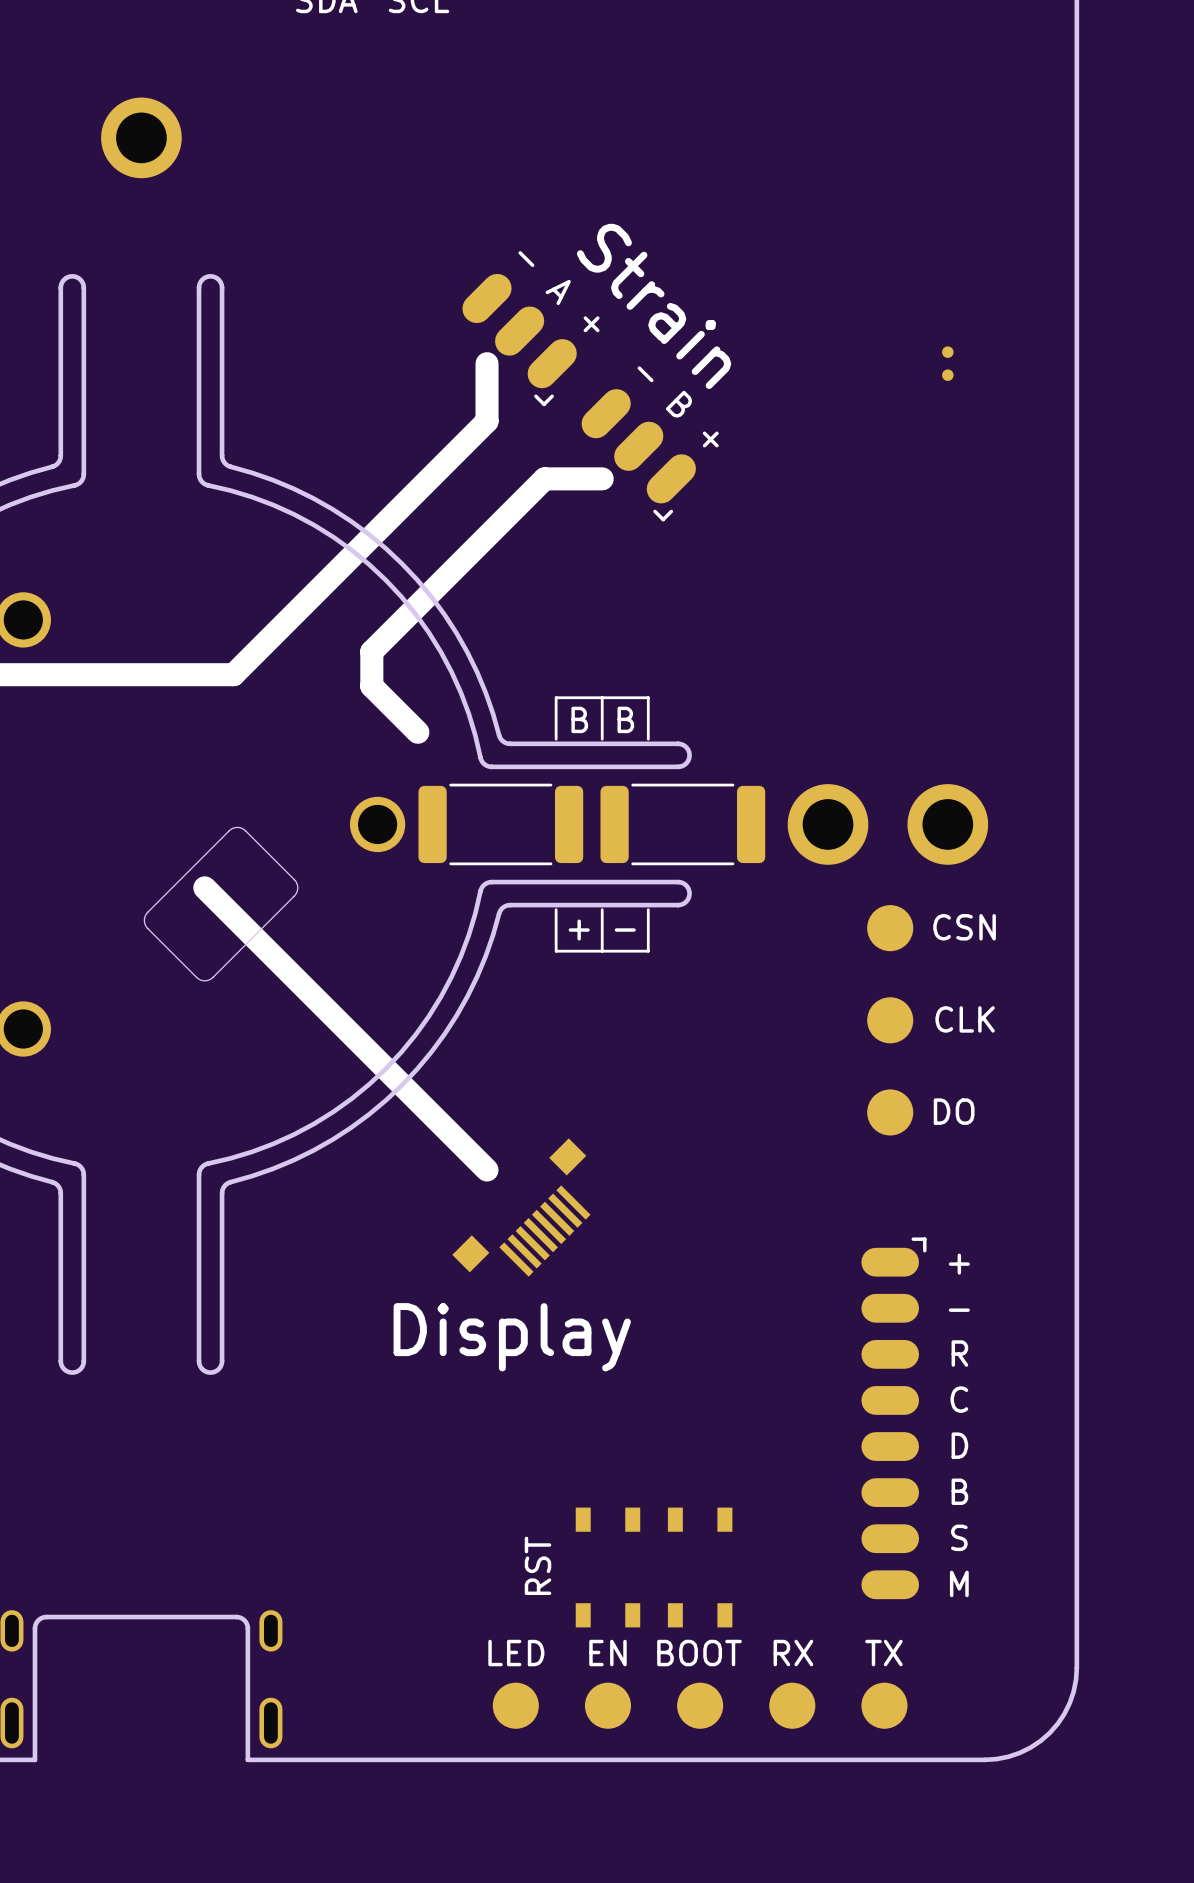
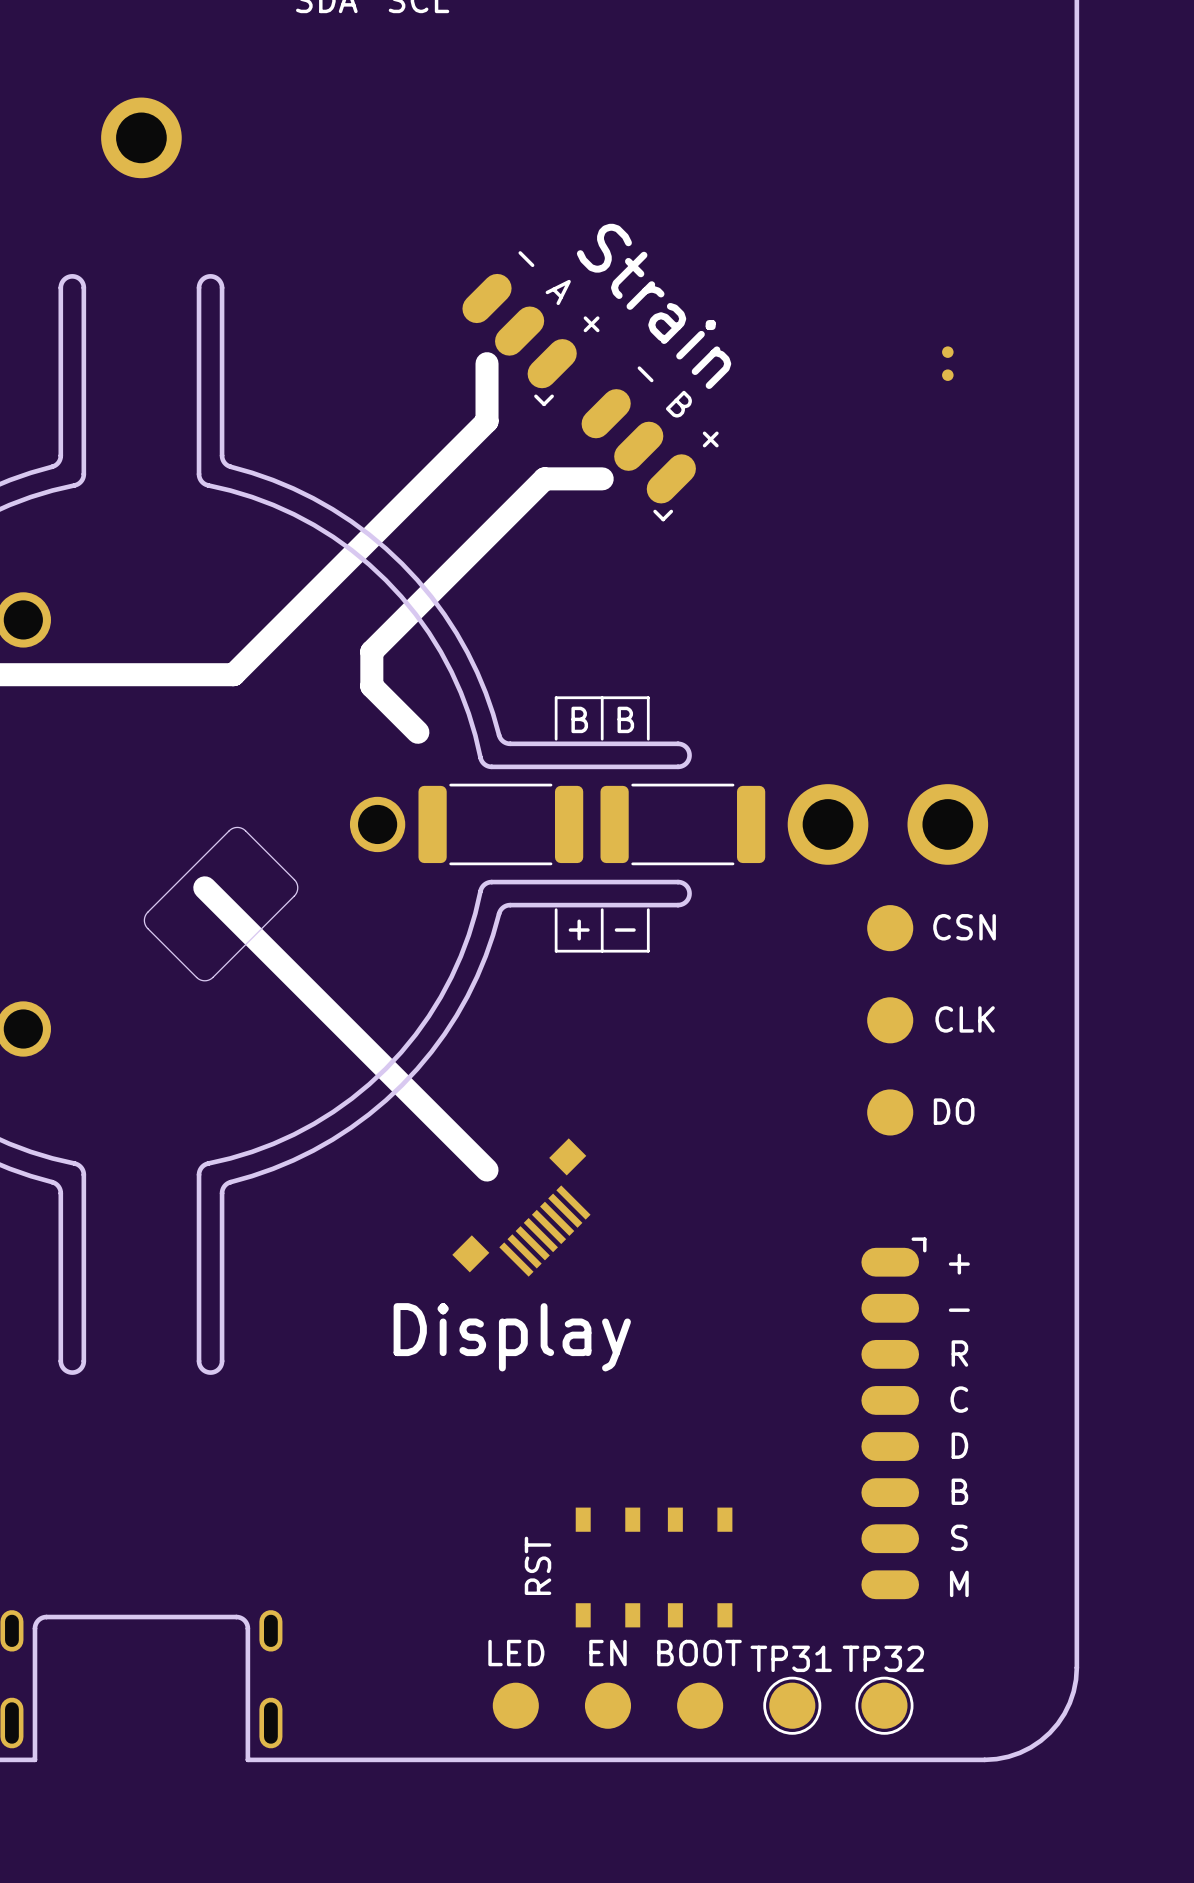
part: RX (792, 1705) -> none
TP31: none -> (792, 1705)
part: TX (884, 1705) -> none
TP32: none -> (884, 1705)

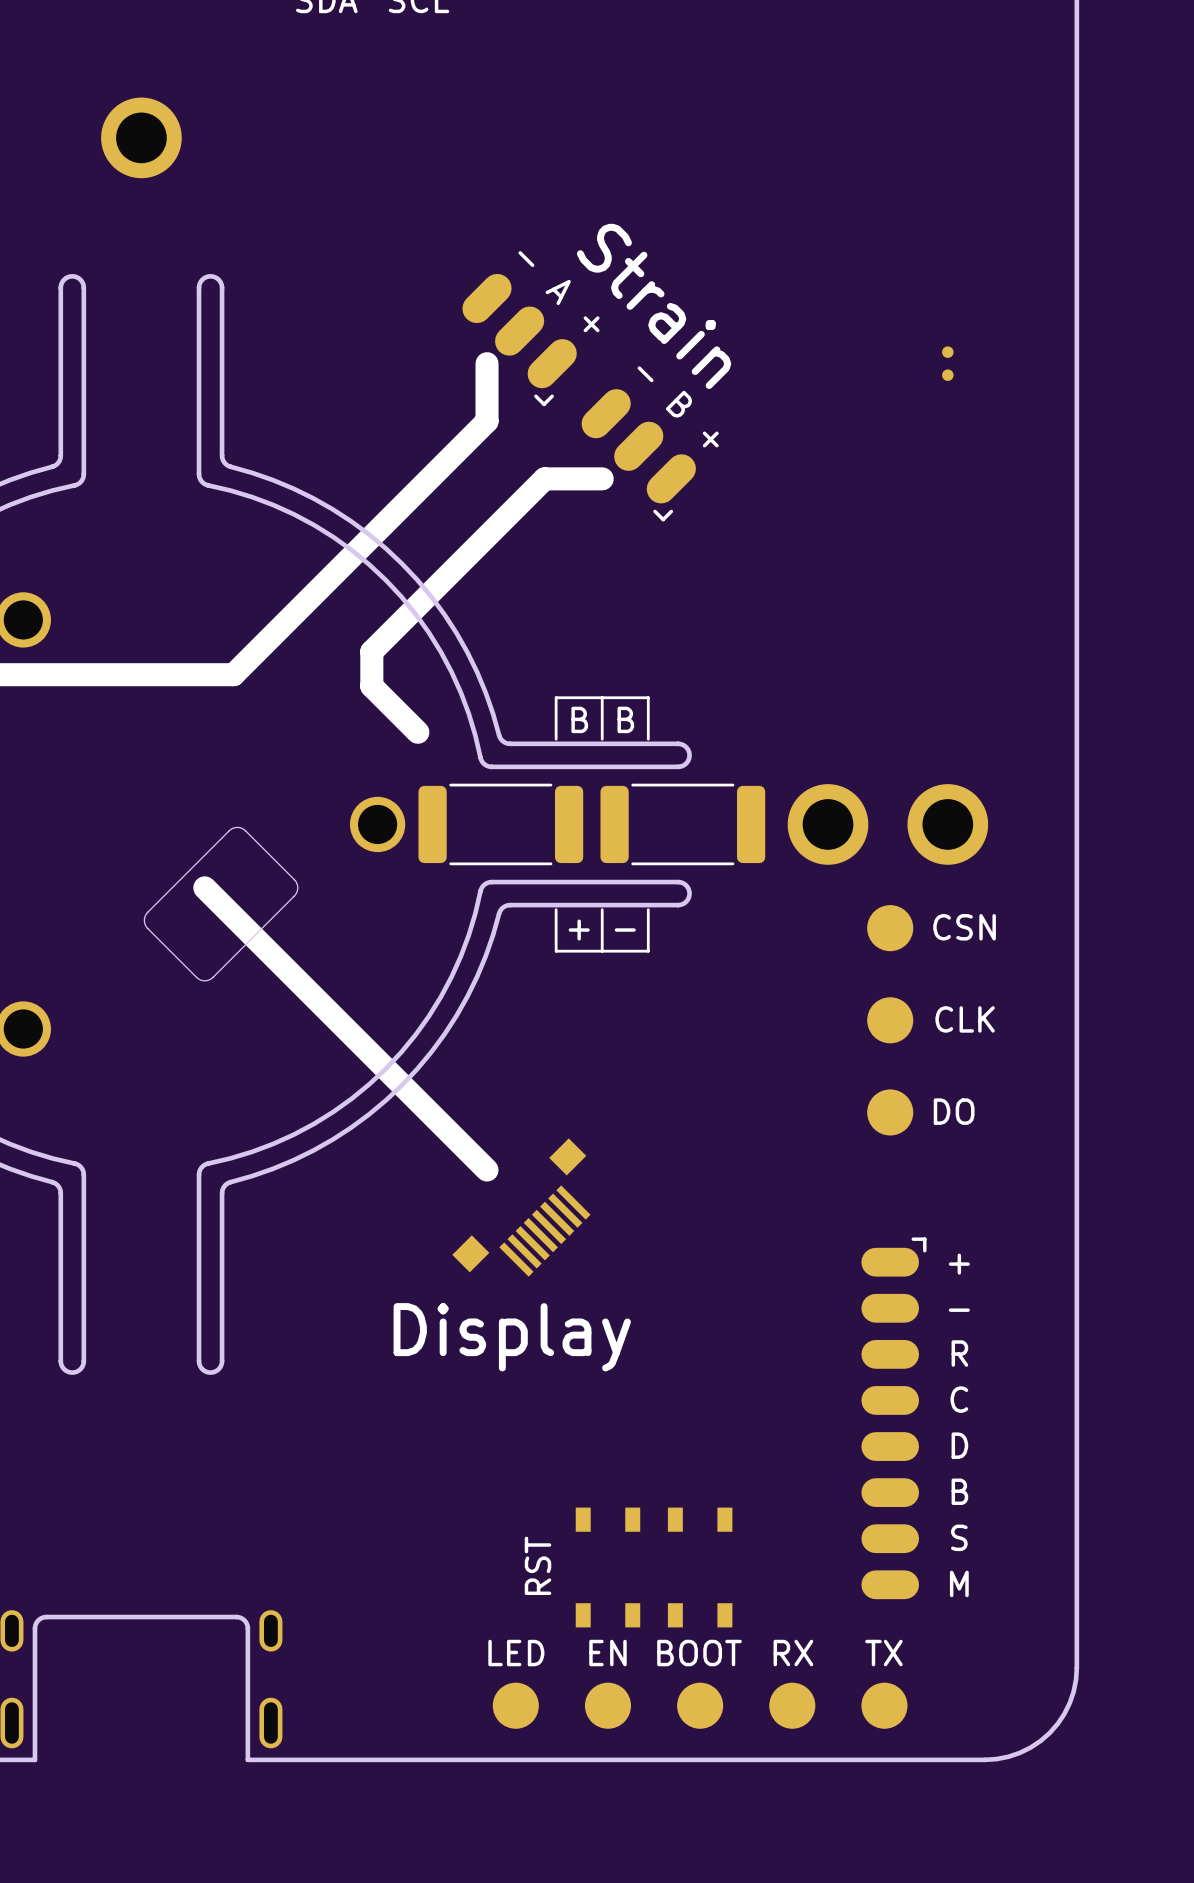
TP31: (792, 1705) -> none
part: none -> RX (792, 1705)
TP32: (884, 1705) -> none
part: none -> TX (884, 1705)

